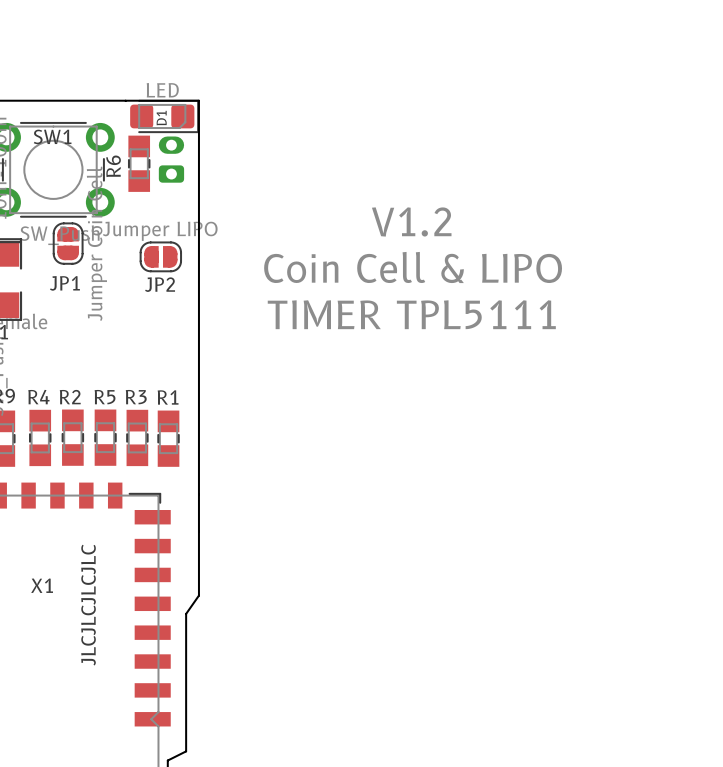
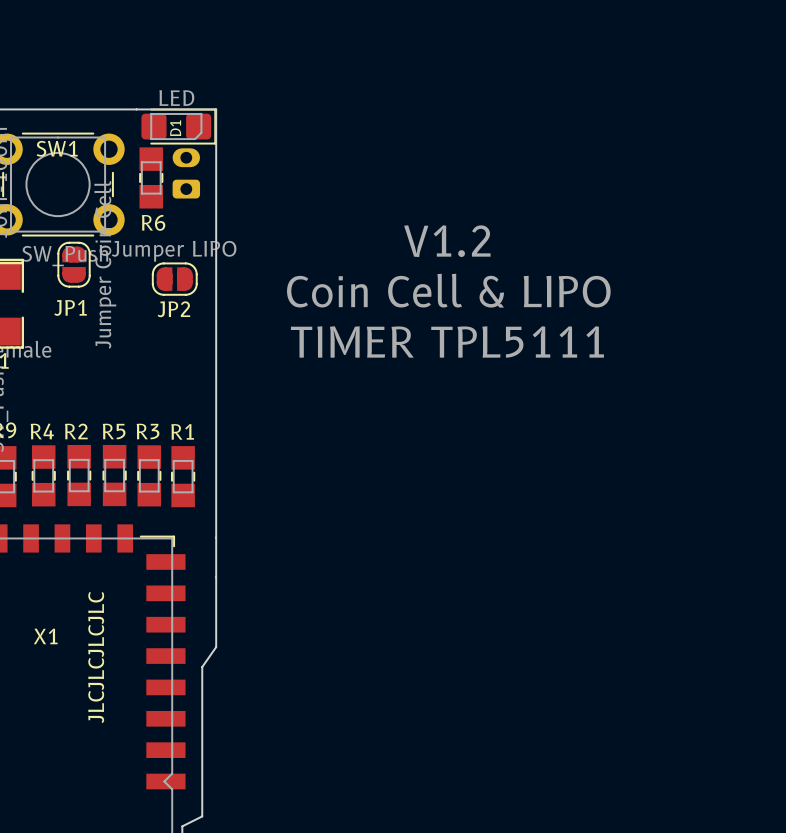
R6 name rotation: 0° (113, 166) -> 90° clockwise (153, 222)
R6 name position: R6 (113, 166) -> R6 (153, 222)

